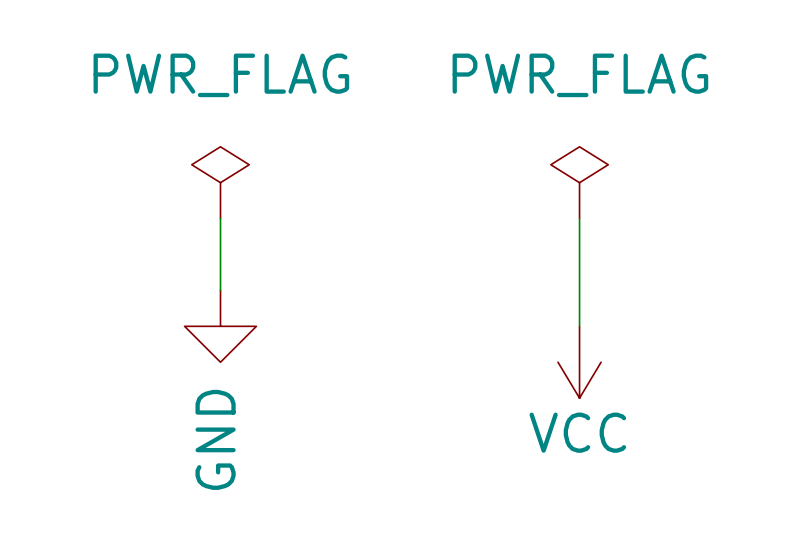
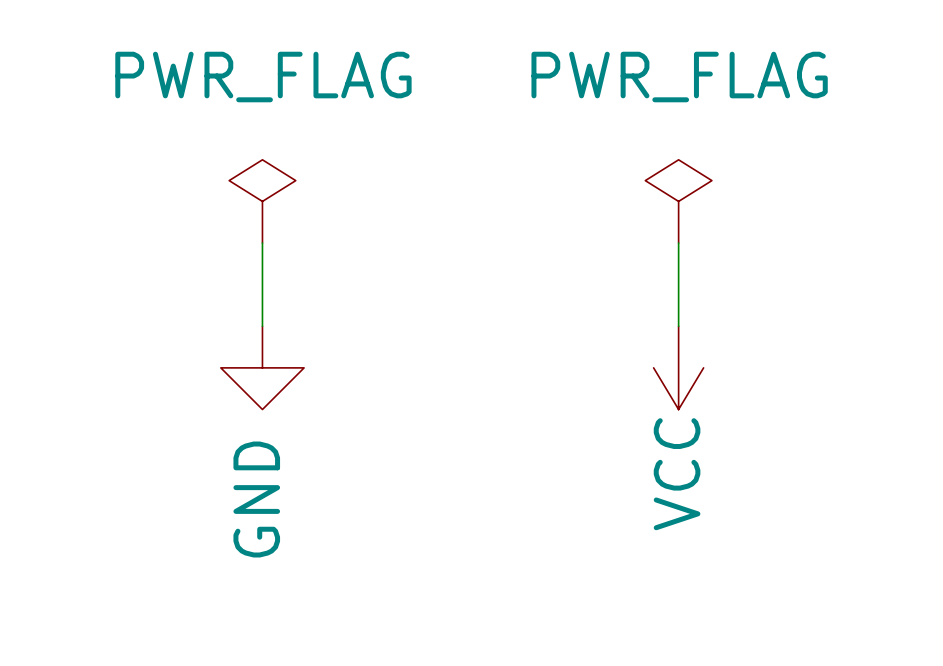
power symbol position: VCC (579, 362) -> VCC (678, 367)
power symbol text rotation: 0° (577, 432) -> 90° counterclockwise (677, 474)

